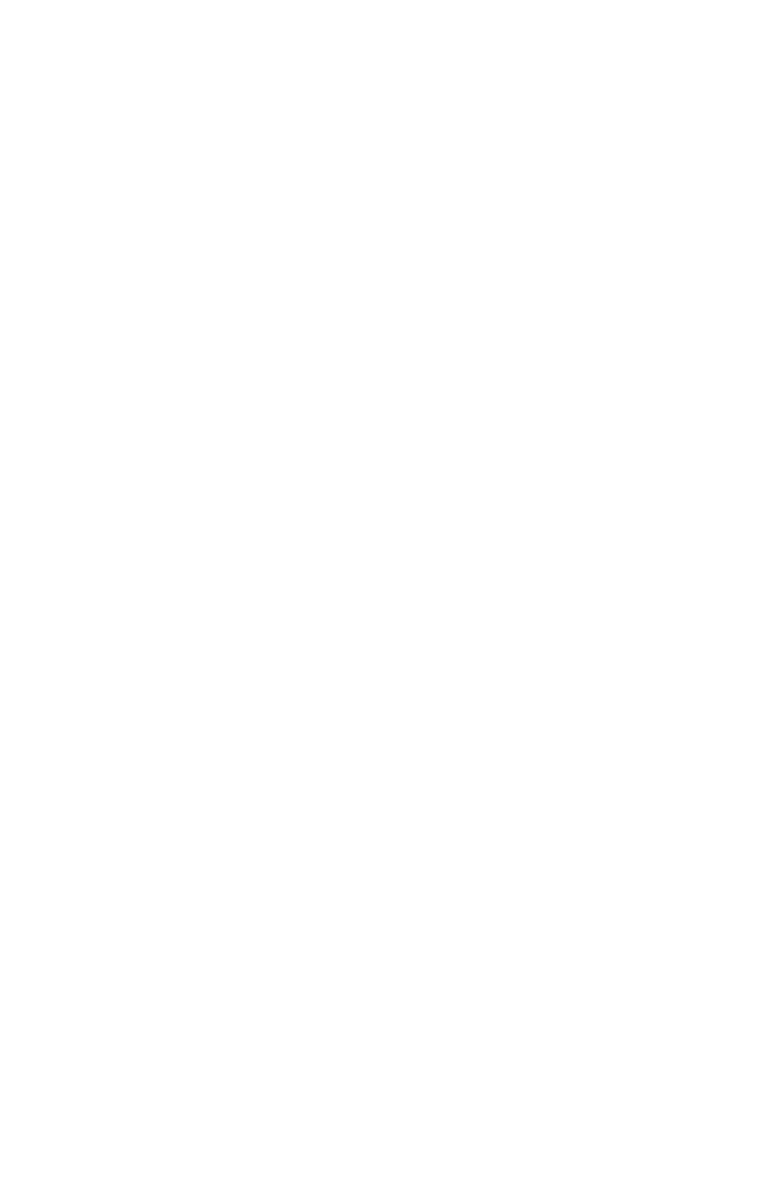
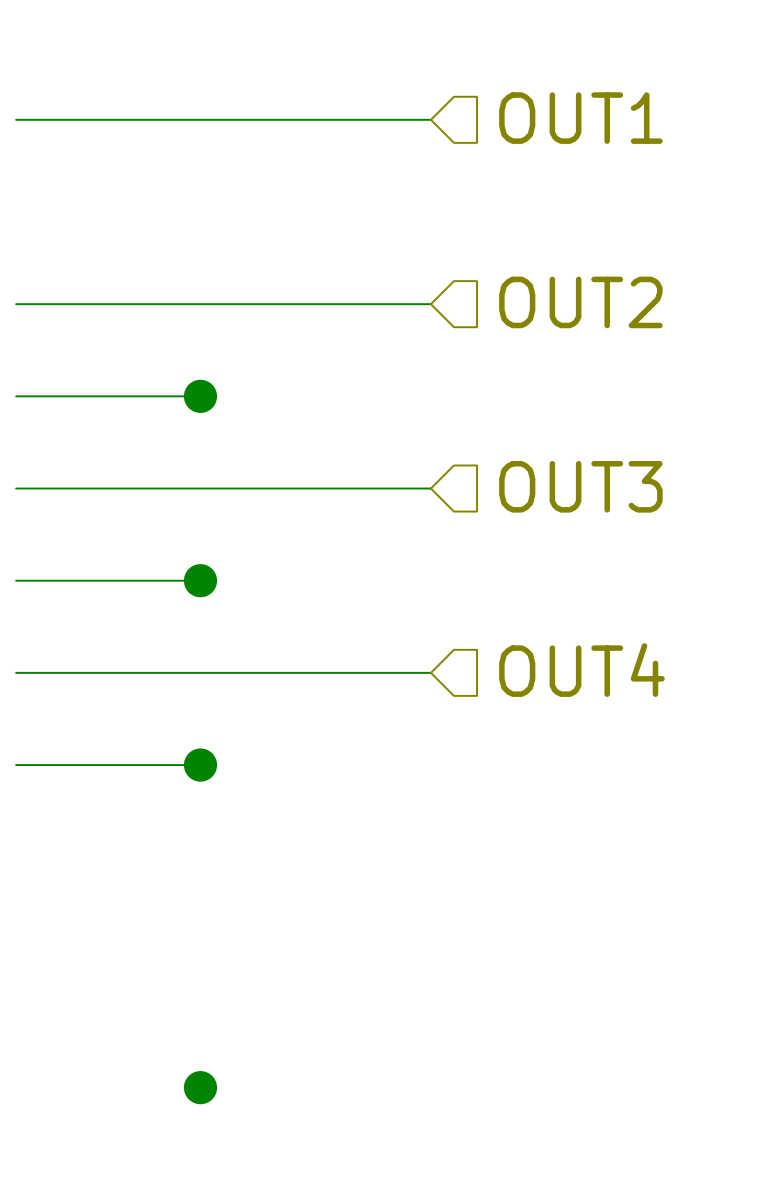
hierarchical label: none -> OUT1 (580, 118)
wire: none -> (16, 119) (430, 119)
hierarchical label: none -> OUT2 (580, 302)
wire: none -> (16, 304) (430, 304)
wire: none -> (16, 396) (200, 396)
junction: none -> (200, 396)
hierarchical label: none -> OUT3 (580, 486)
wire: none -> (16, 488) (430, 488)
wire: none -> (16, 580) (200, 580)
junction: none -> (200, 580)
hierarchical label: none -> OUT4 (581, 670)
wire: none -> (16, 672) (430, 672)
wire: none -> (16, 765) (200, 765)
junction: none -> (200, 765)
junction: none -> (200, 1087)

